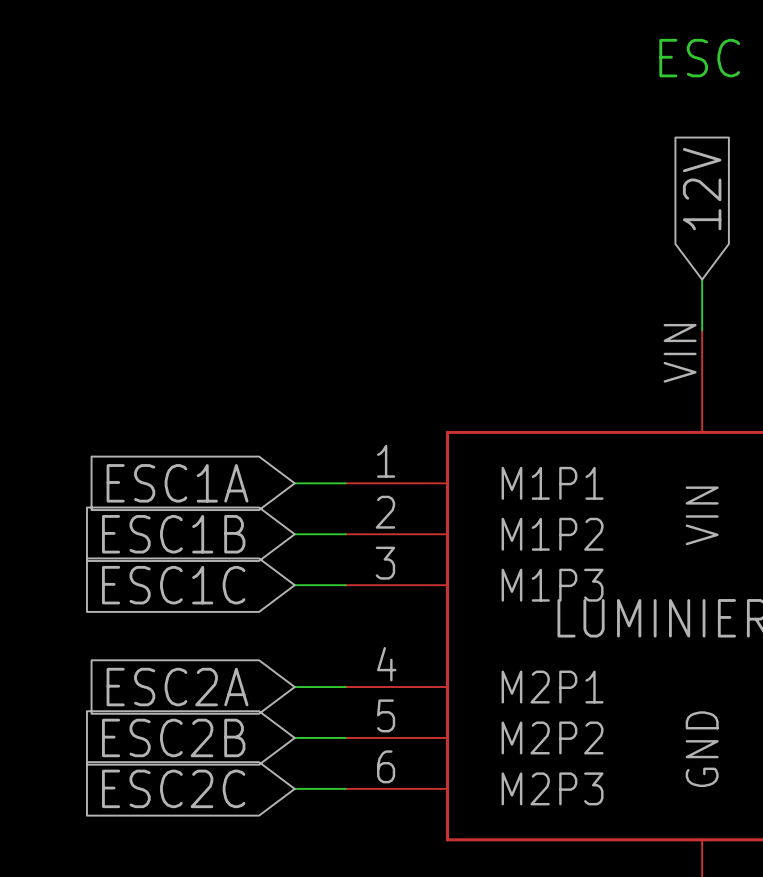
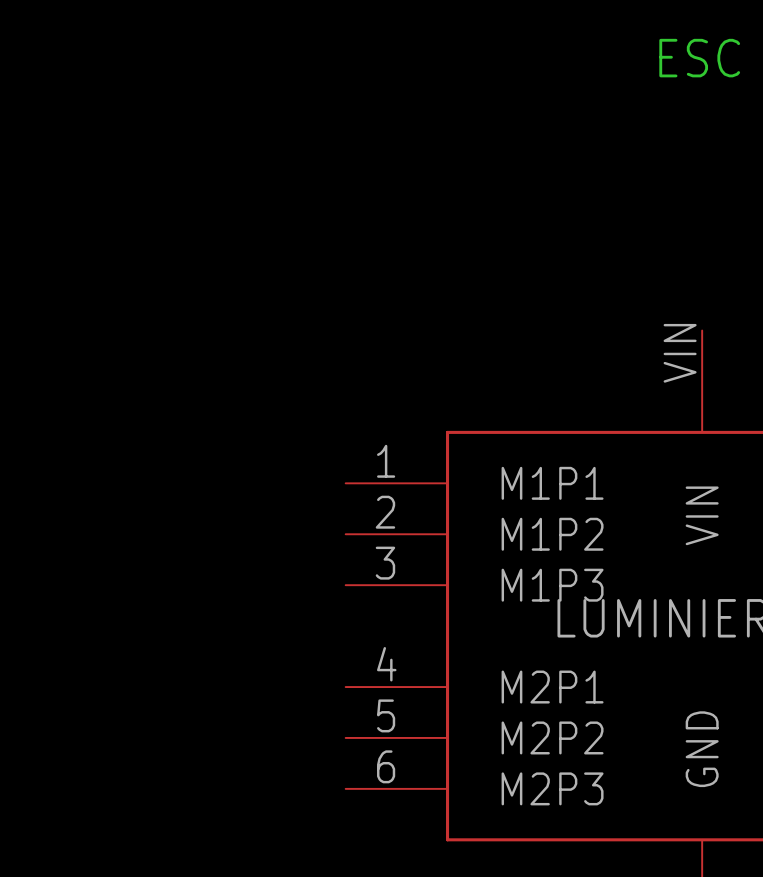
global label: 12V (702, 189) -> none
wire: (702, 279) (702, 330) -> none
global label: ESC1A (177, 483) -> none
wire: (294, 483) (345, 483) -> none
global label: ESC1B (173, 534) -> none
wire: (294, 534) (345, 534) -> none
global label: ESC1C (173, 585) -> none
wire: (294, 585) (345, 585) -> none
global label: ESC2A (177, 687) -> none
wire: (294, 687) (345, 687) -> none
global label: ESC2B (173, 737) -> none
wire: (294, 737) (345, 737) -> none
global label: ESC2C (173, 788) -> none
wire: (294, 788) (345, 788) -> none

